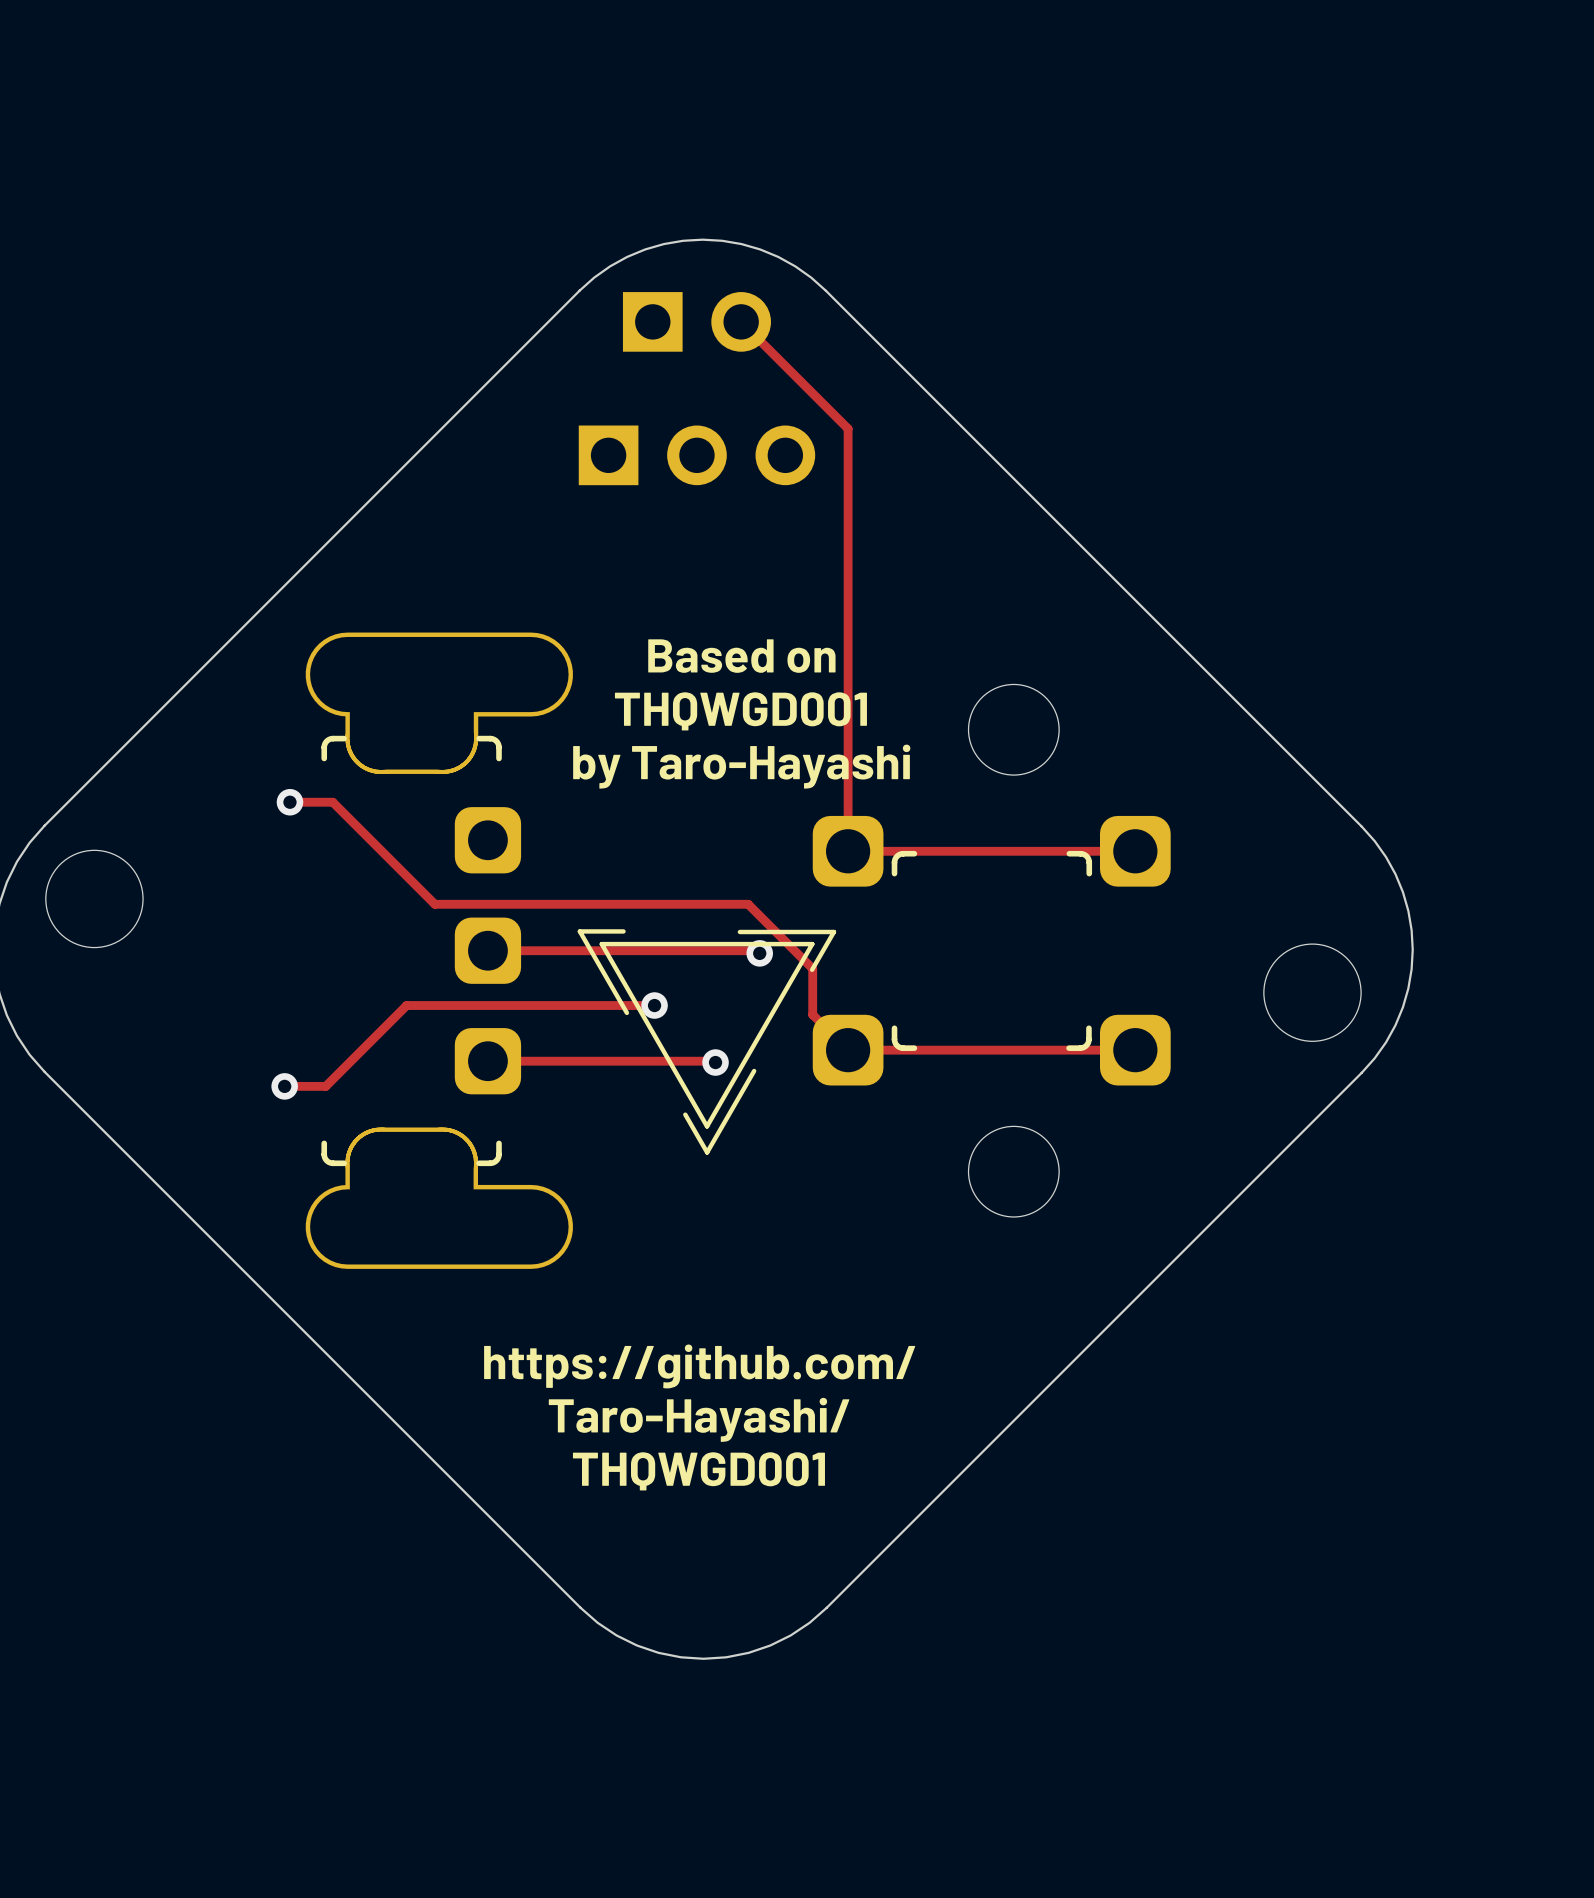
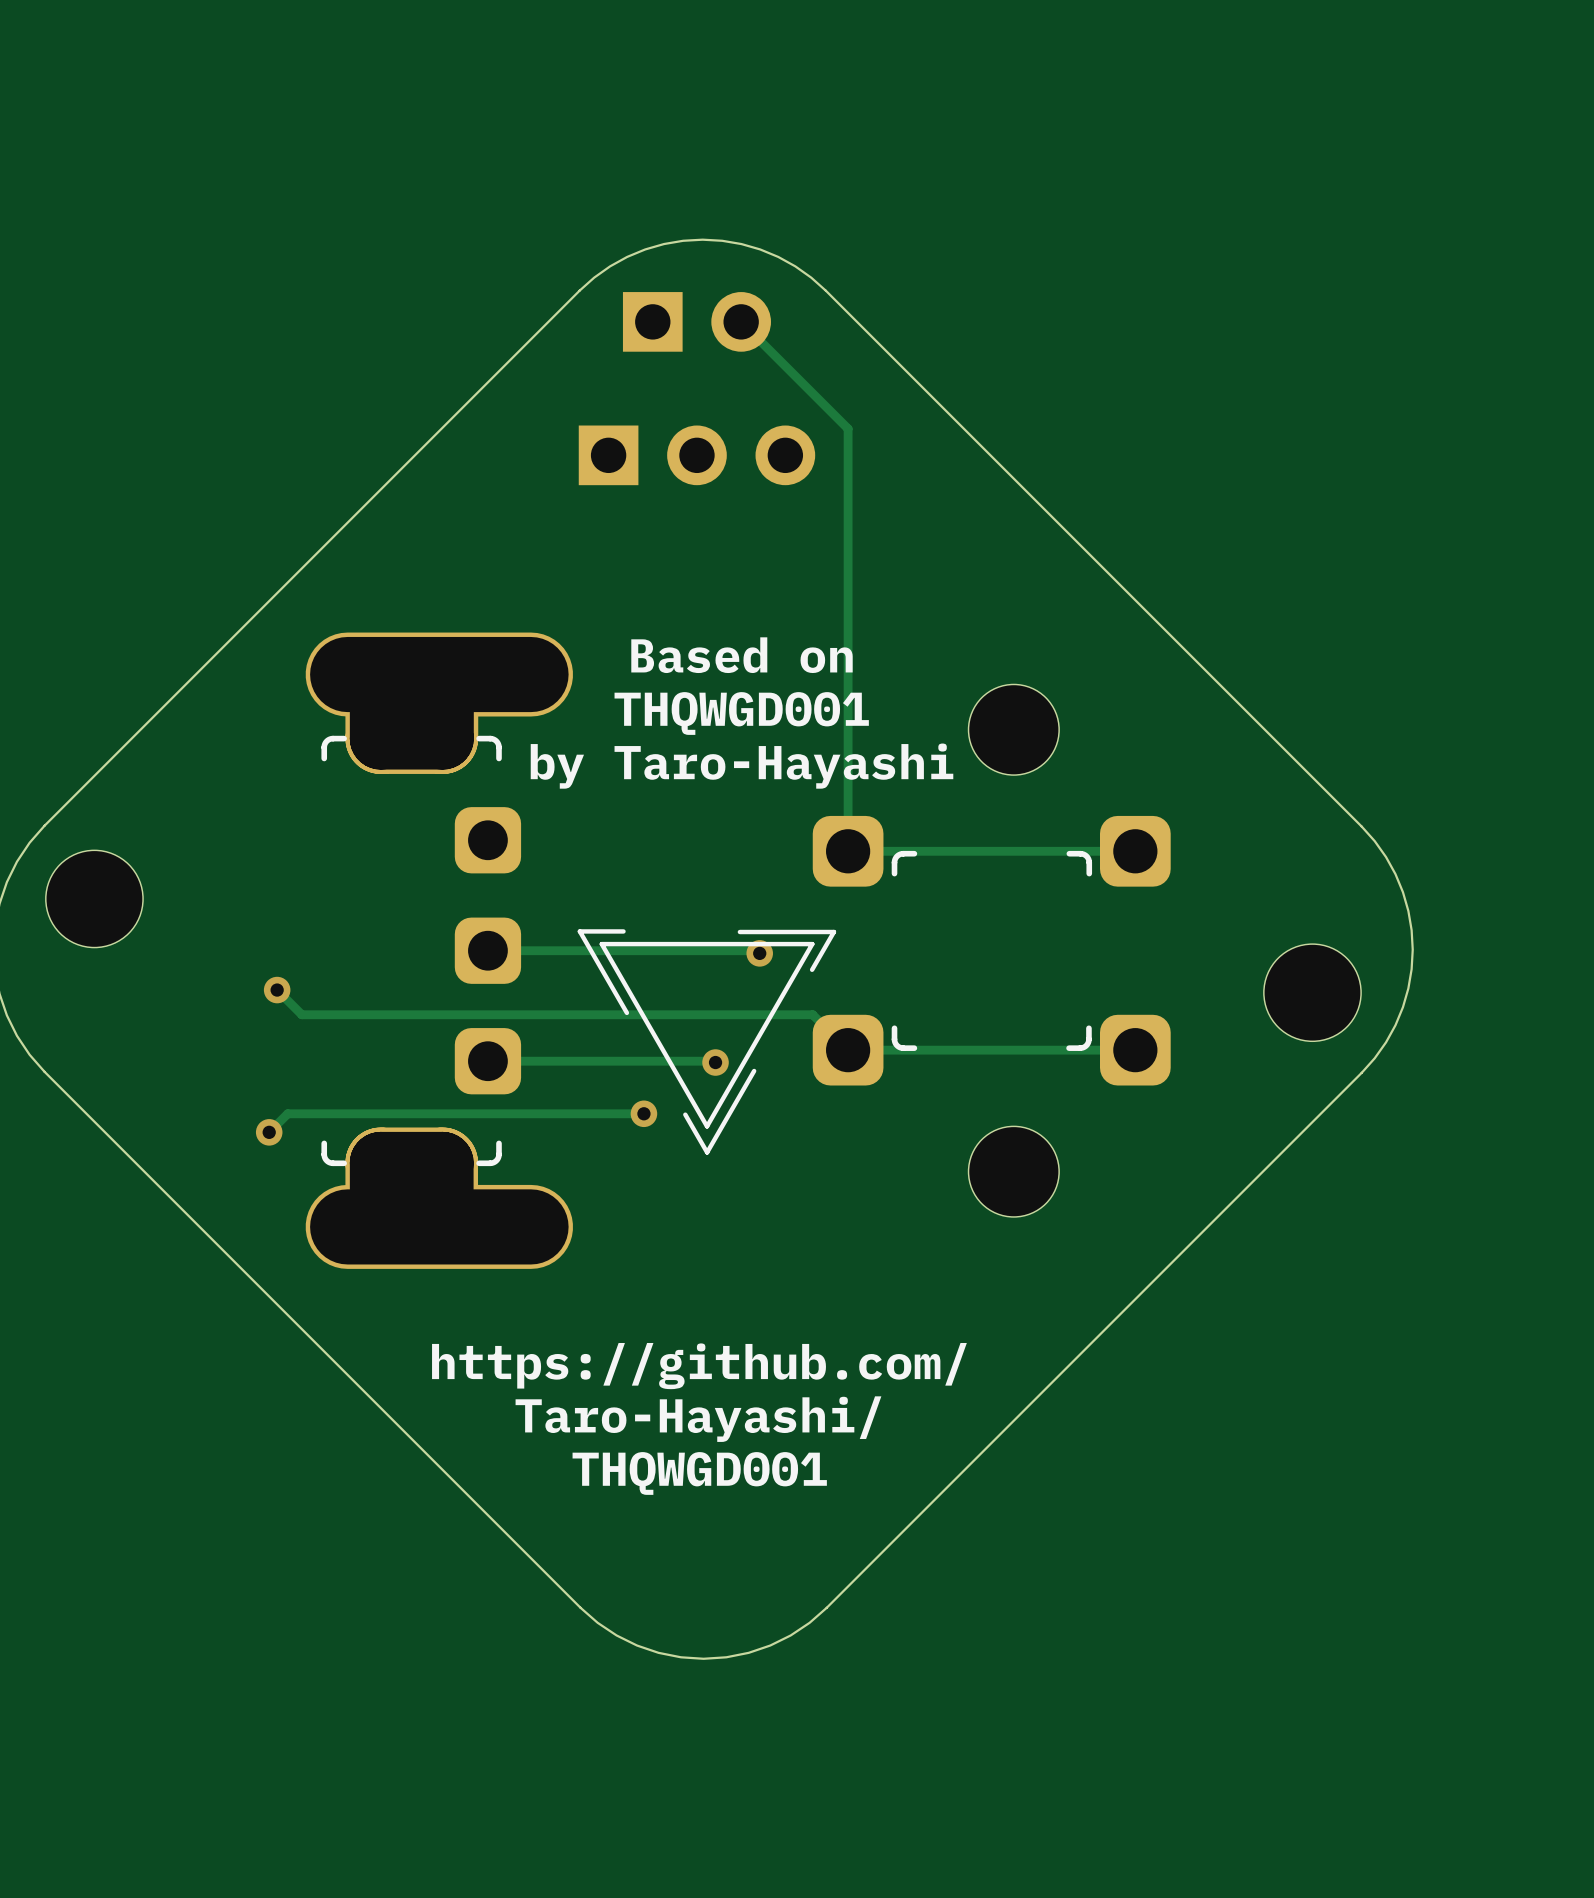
track: (289, 802) (332, 802) (434, 904) (748, 904) (812, 968) (812, 1014) -> (277, 990) (301, 1014) (812, 1014)
via: (289, 802) -> none
via: none -> (277, 990)
track: (654, 1005) (406, 1005) (325, 1086) (284, 1086) -> none
via position: (654, 1005) -> (643, 1113)
via: (284, 1086) -> none
track: none -> (643, 1113) (287, 1113) (269, 1132)
via: none -> (269, 1132)

